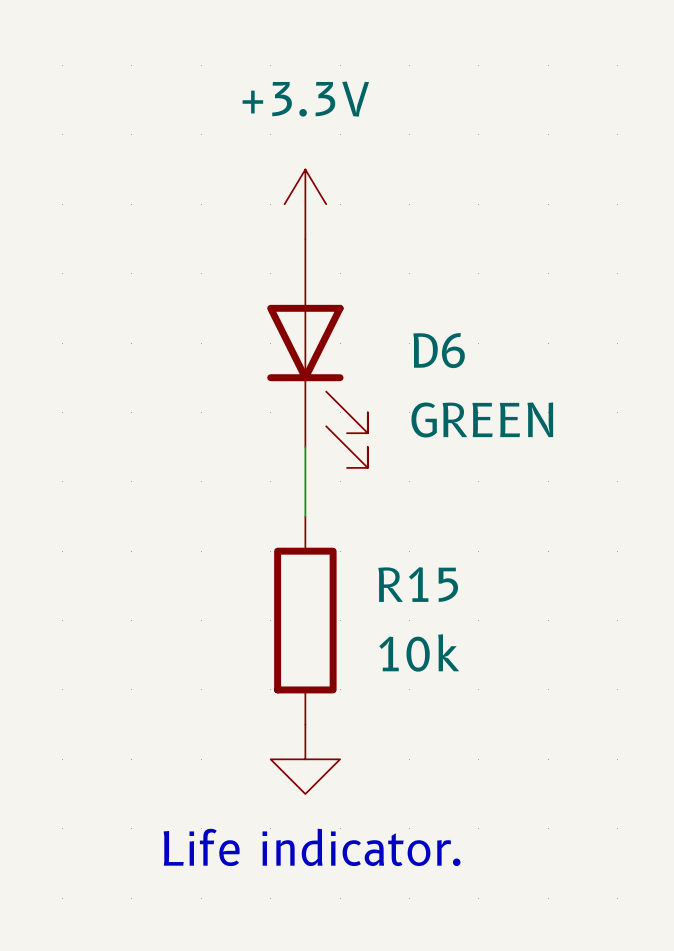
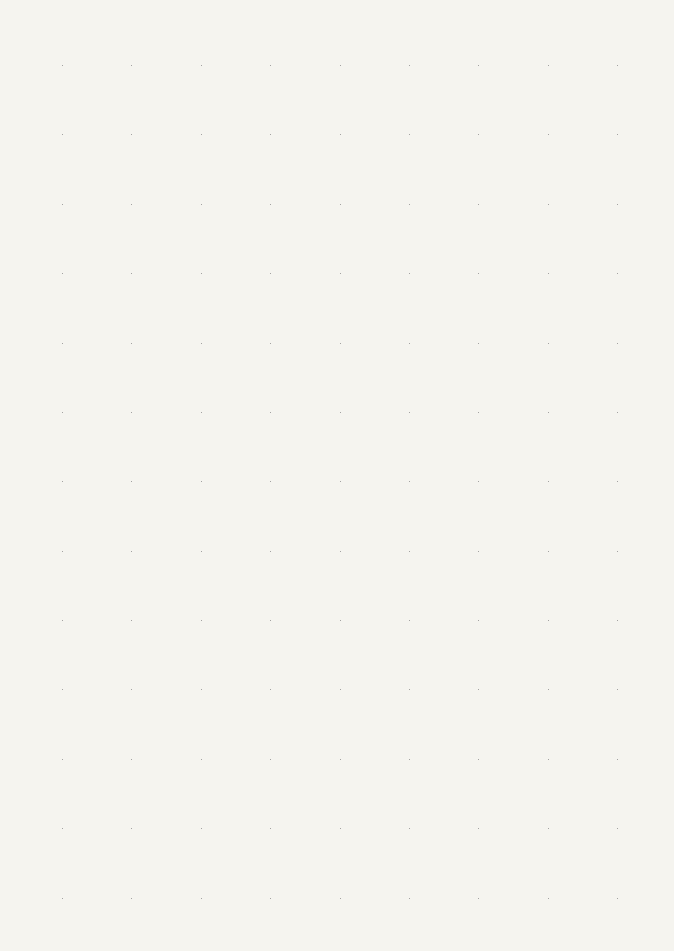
power symbol: +3.3V (305, 204) -> none
D6: GREEN (317, 353) -> none
wire: (305, 447) (305, 516) -> none
R15: 10k (305, 620) -> none
power symbol: (305, 759) -> none
text: Life indicator. (312, 847) -> none

